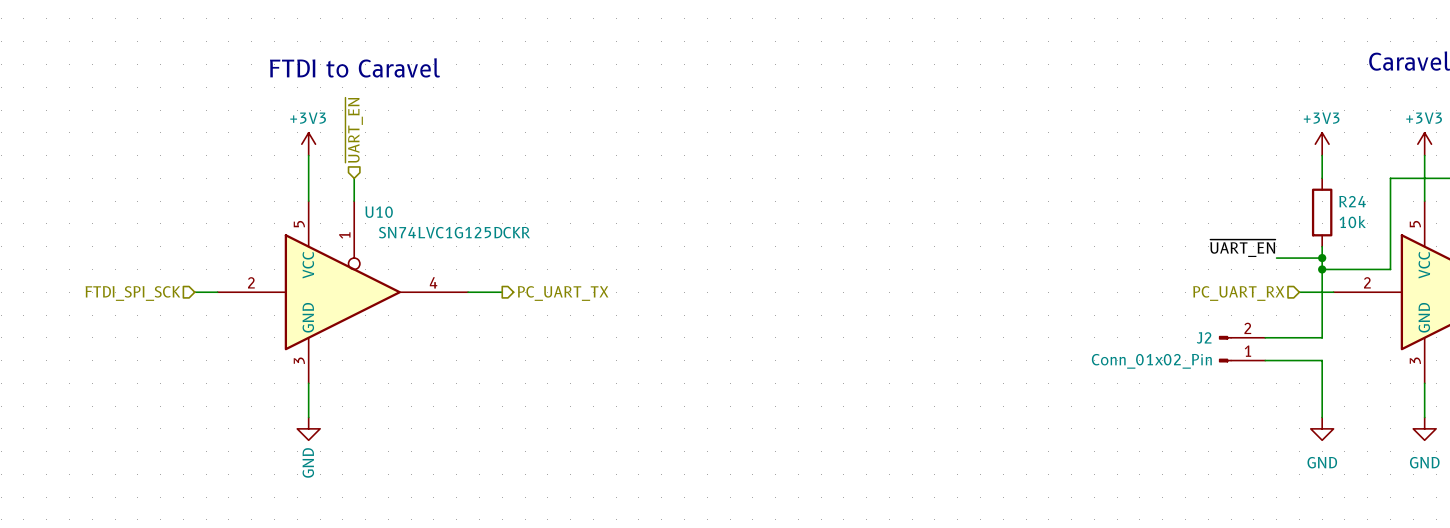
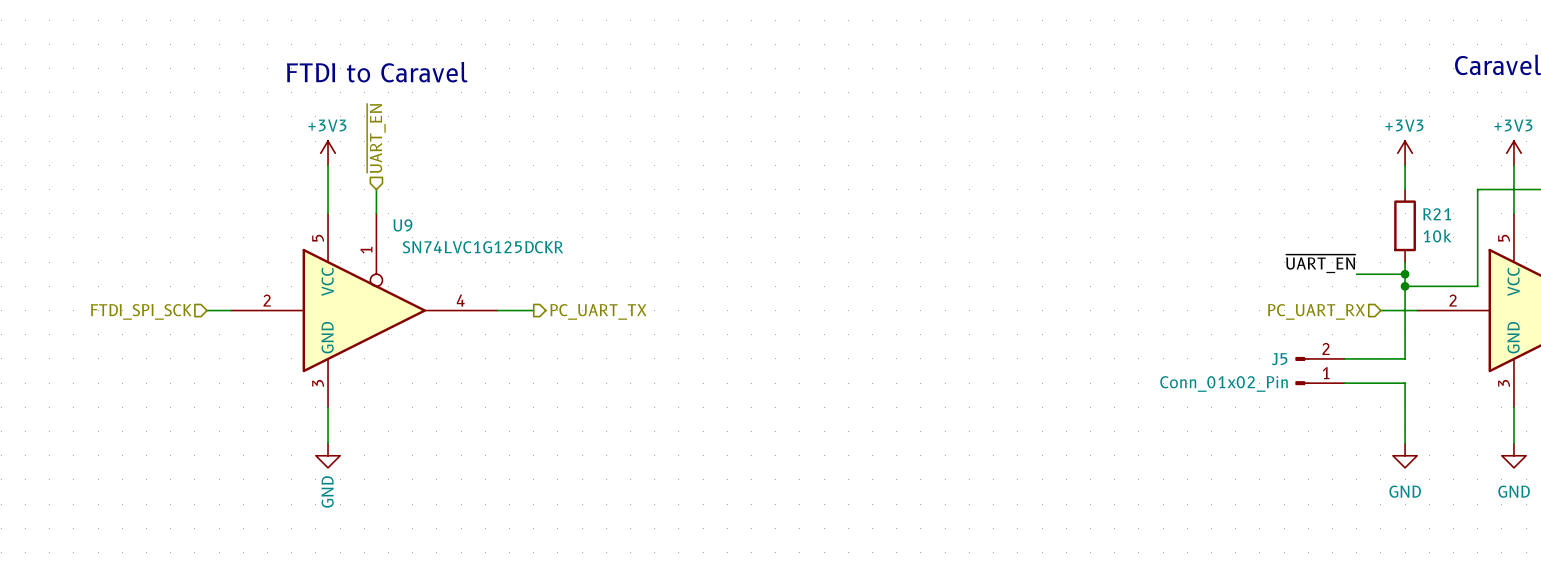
R24 name: R24 (1352, 201) -> R21 (1437, 214)
U10 name: U10 (379, 212) -> U9 (402, 225)
J2 name: J2 (1204, 337) -> J5 (1279, 359)

